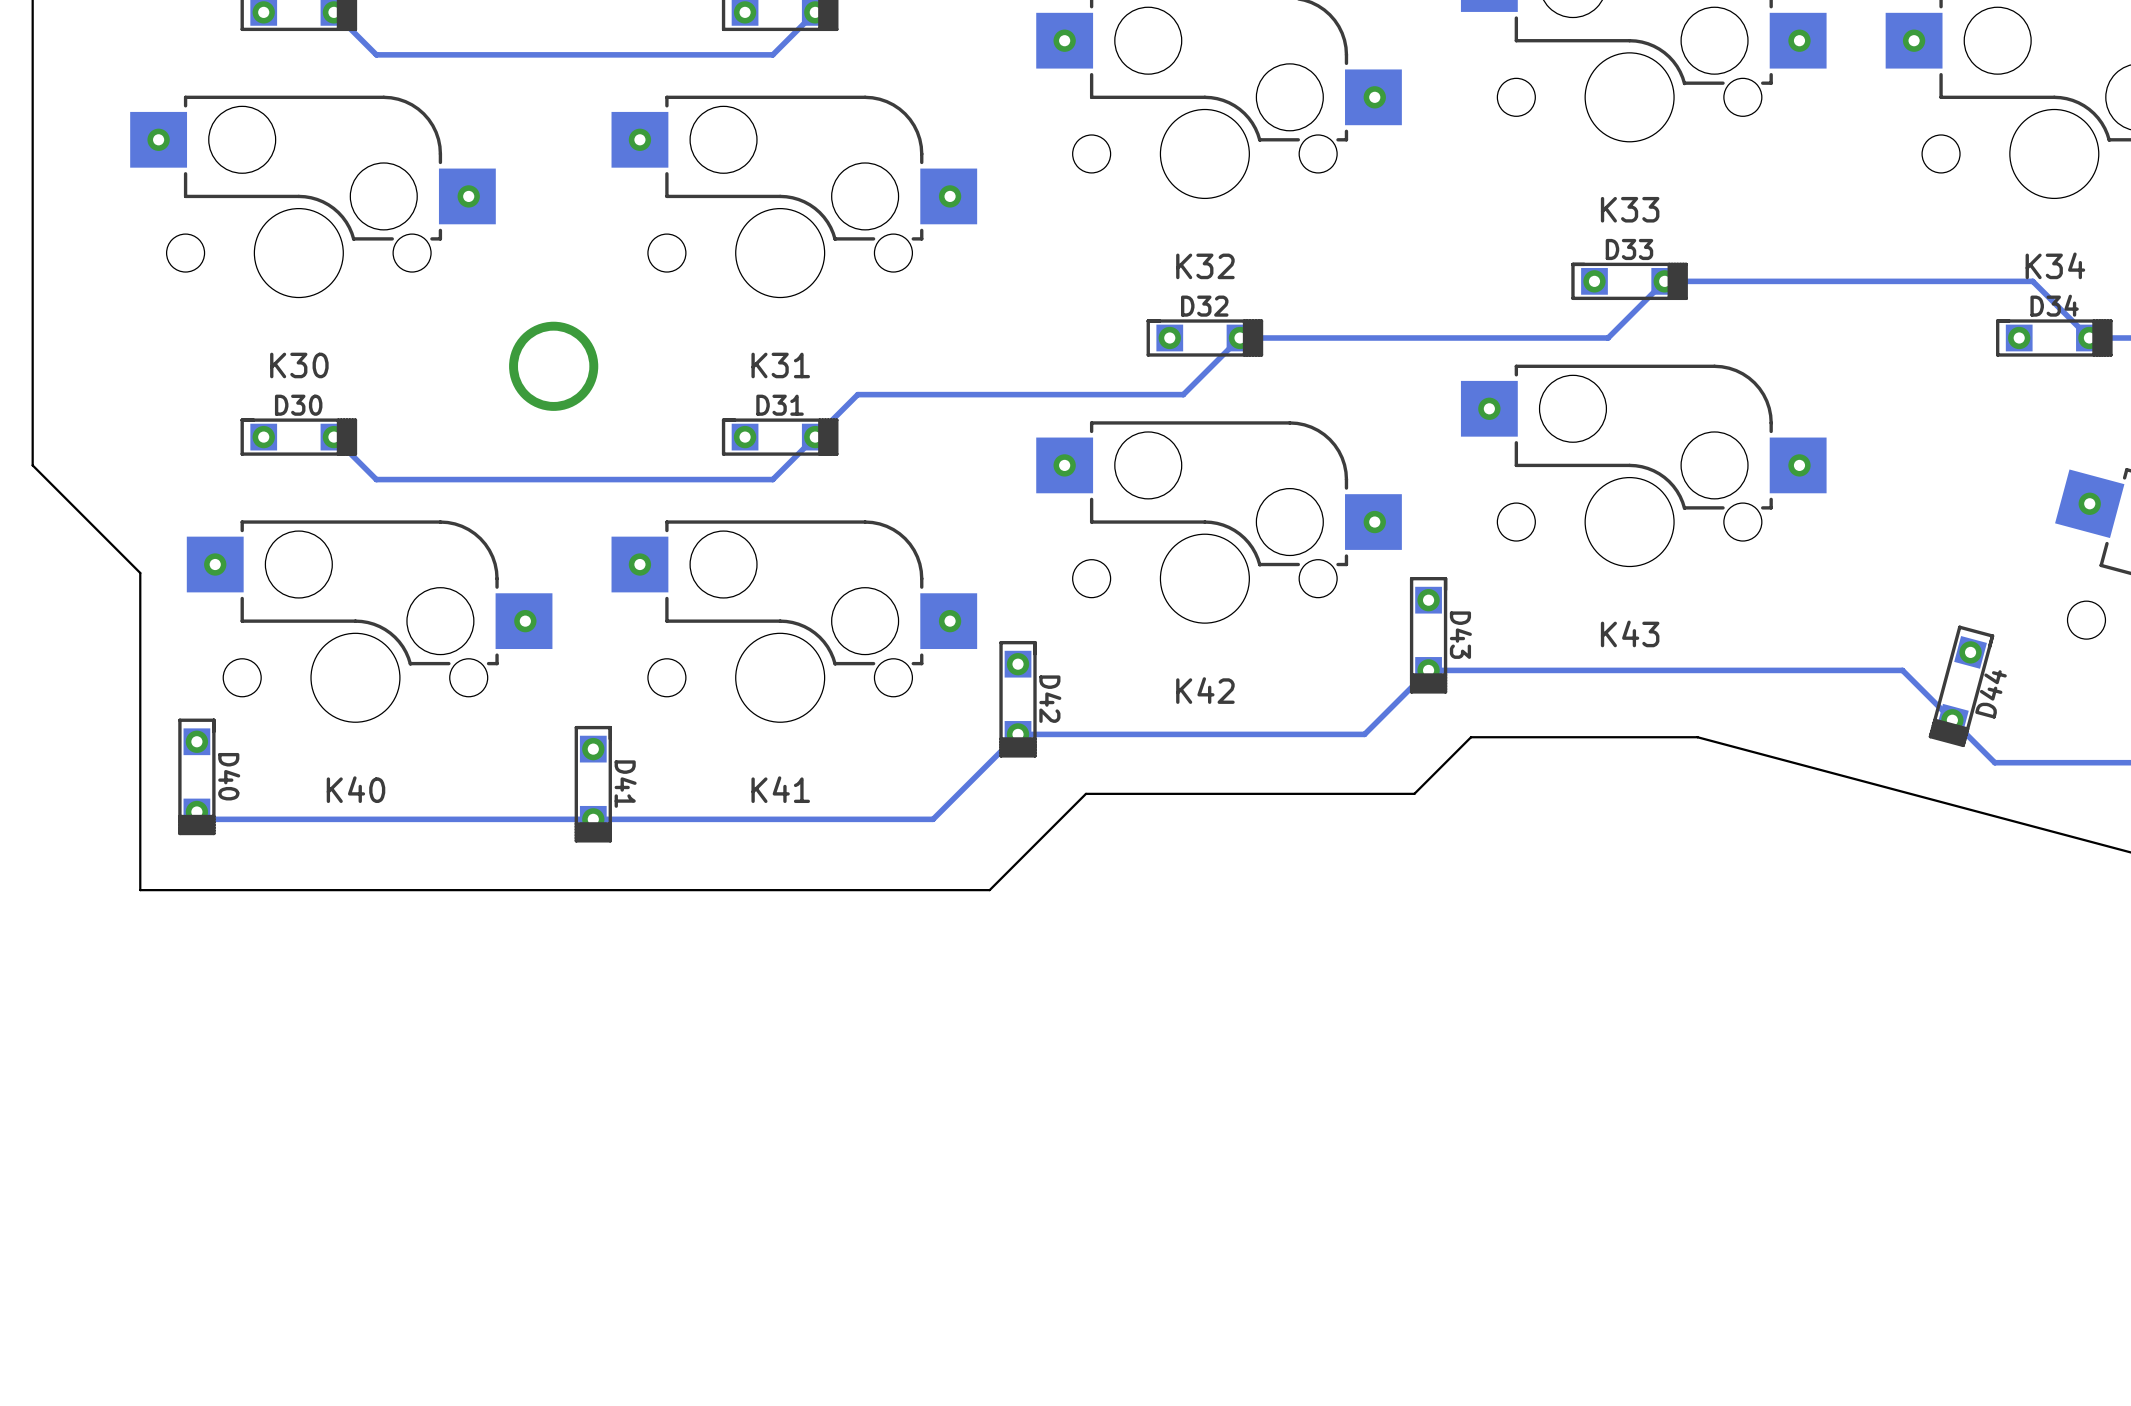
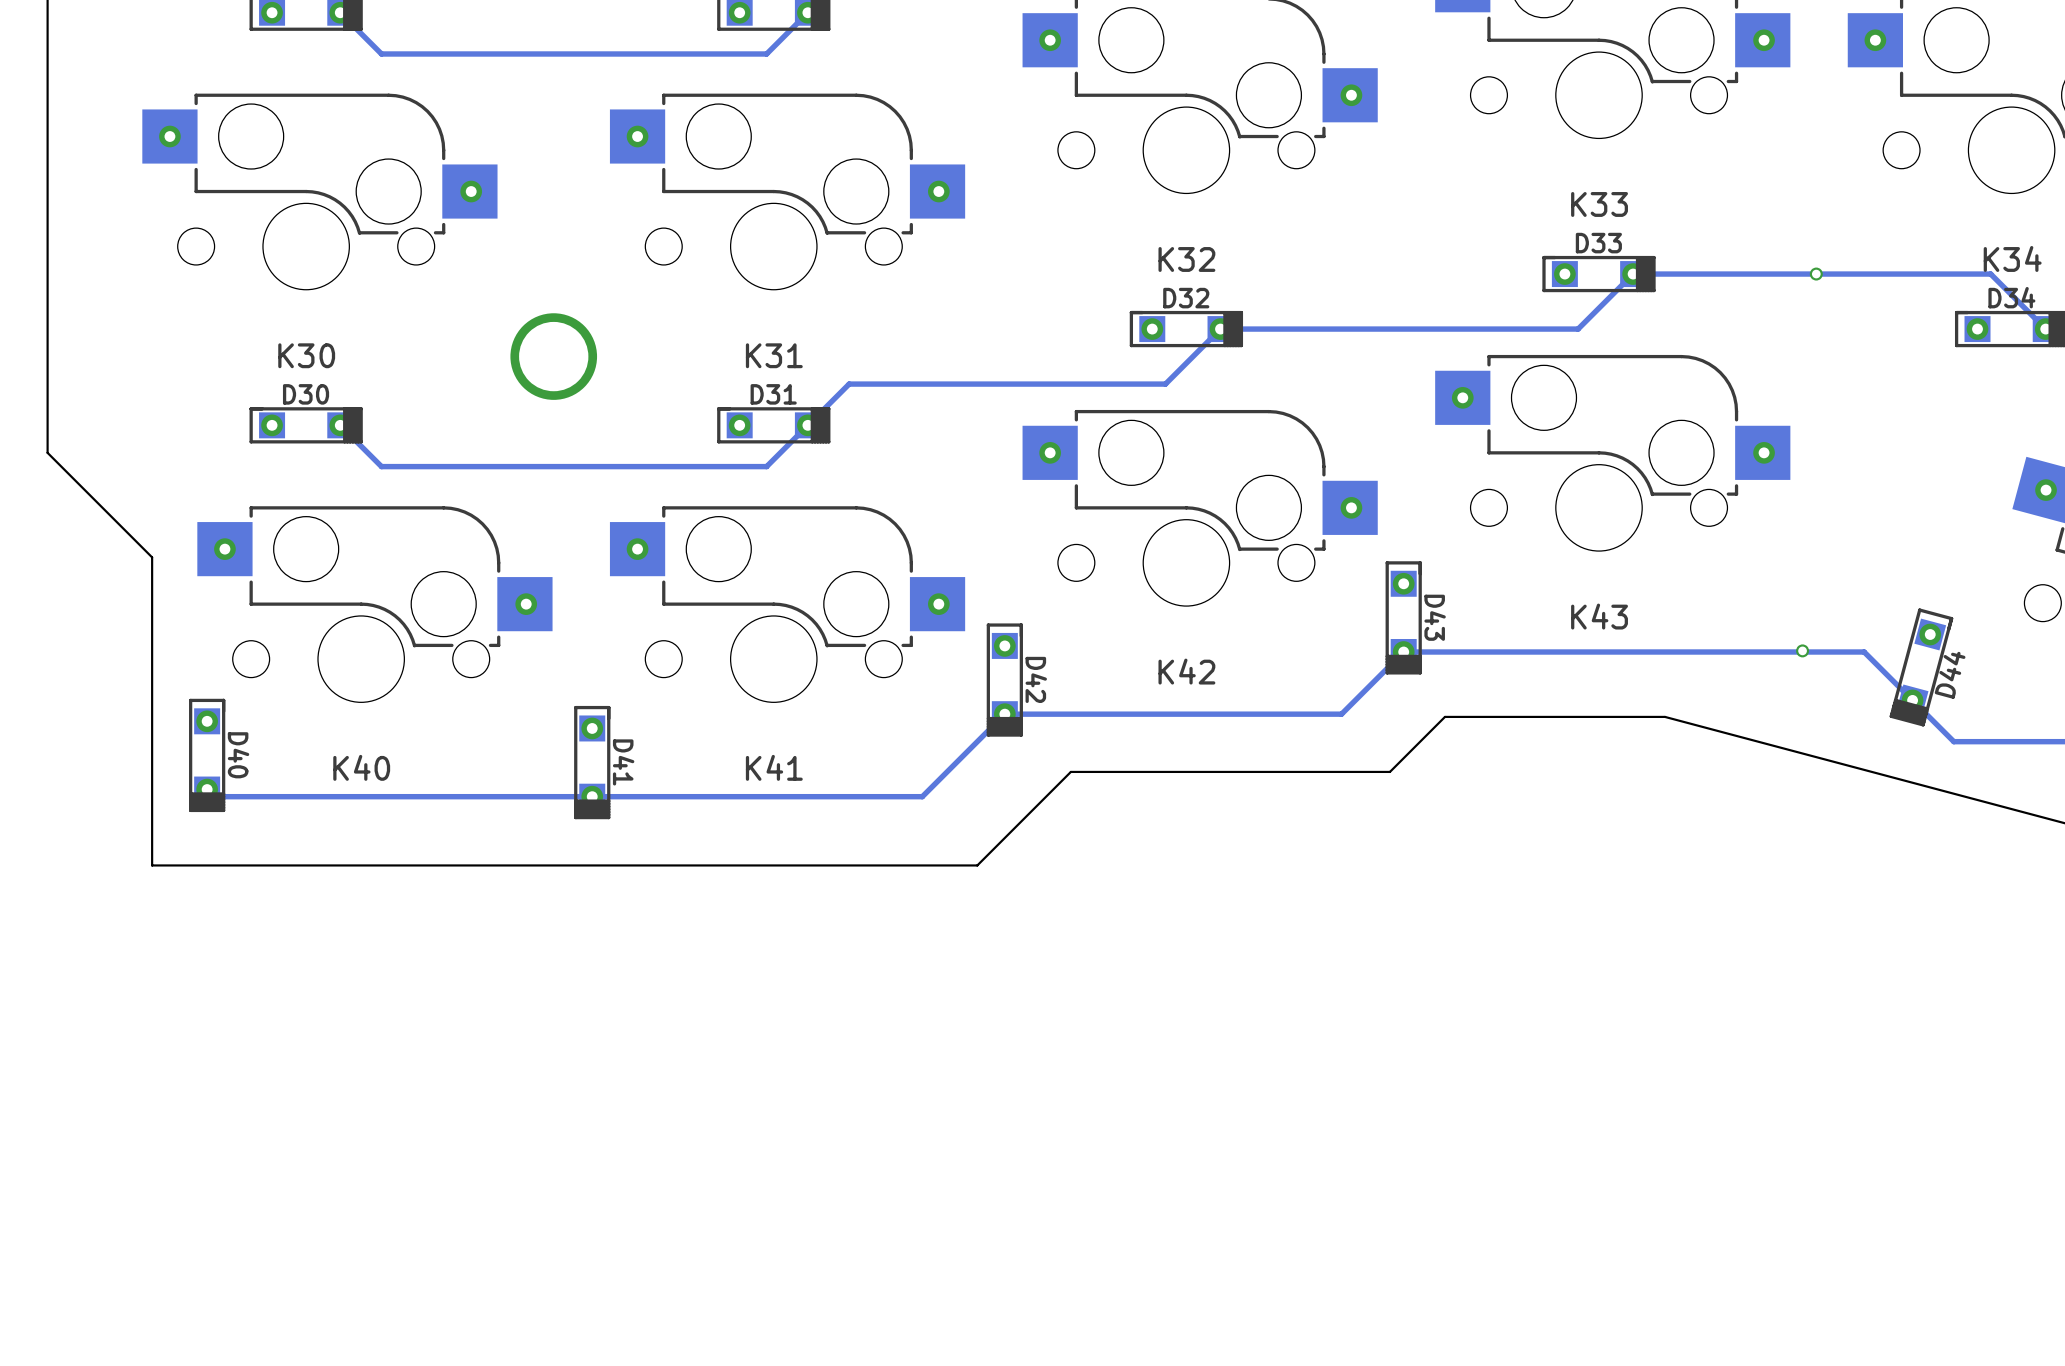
via: none -> (1816, 274)
via: none -> (1802, 650)

